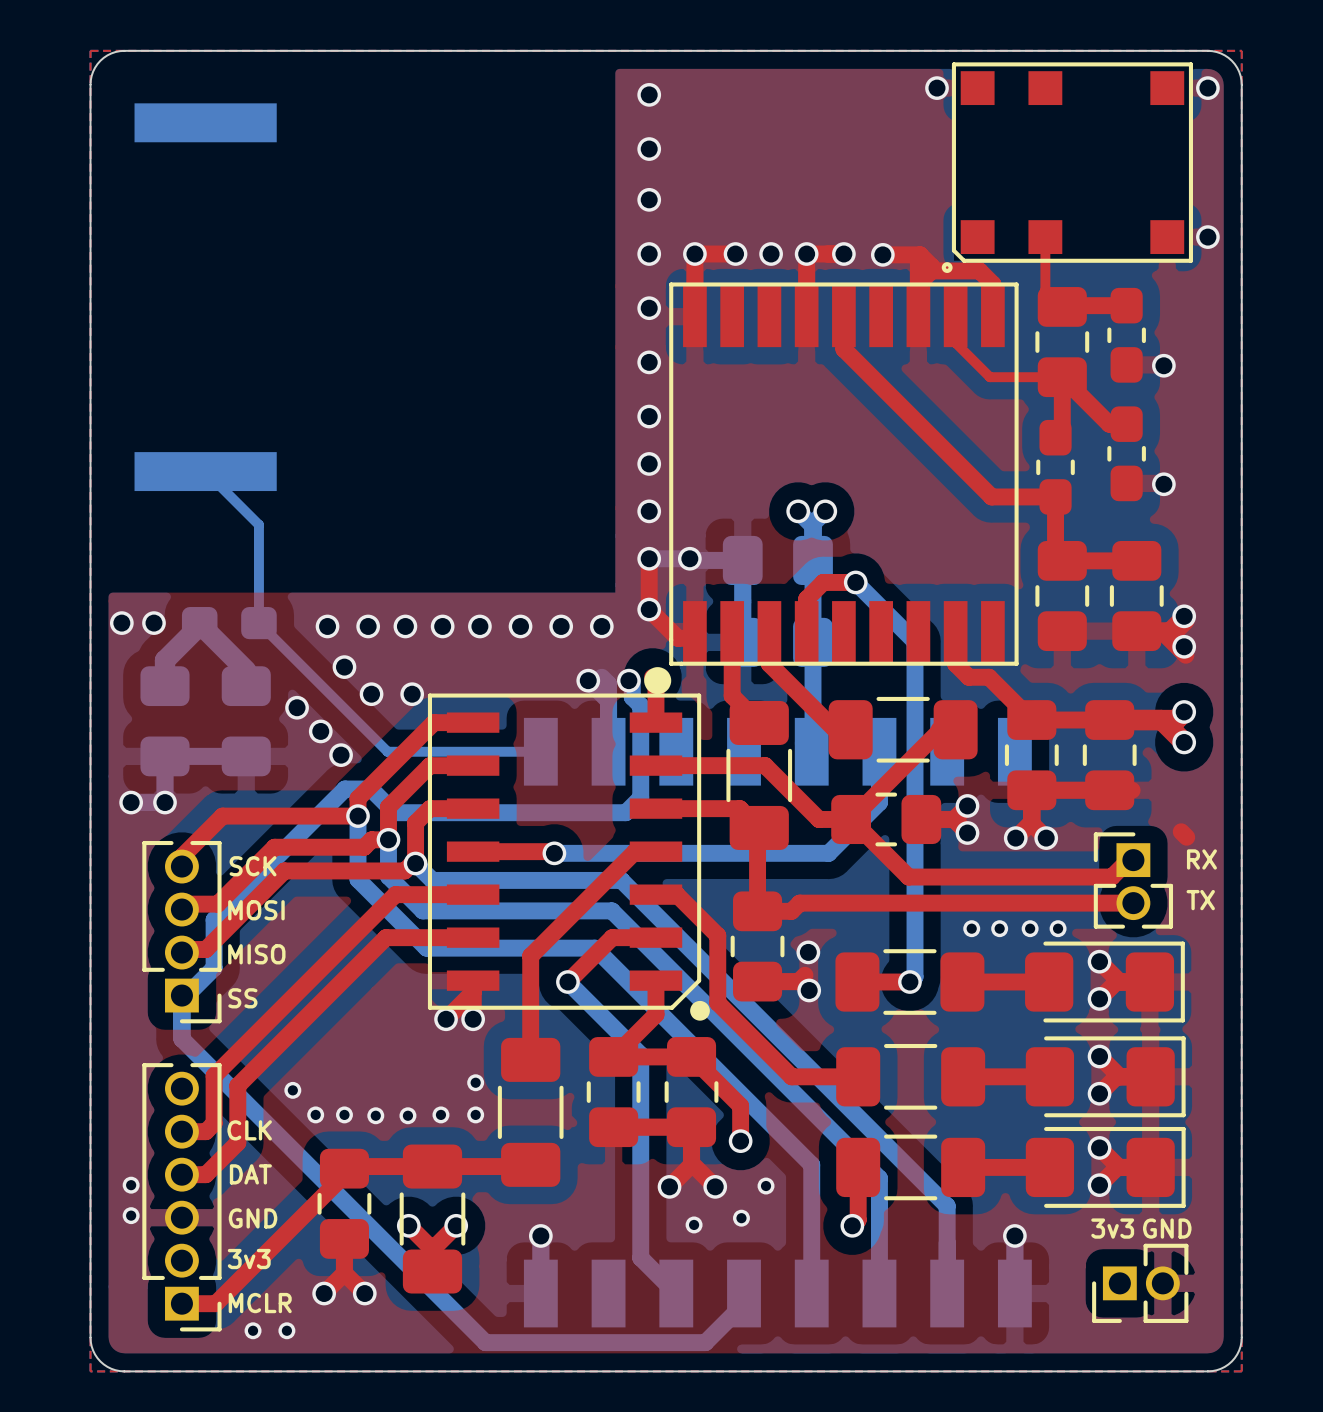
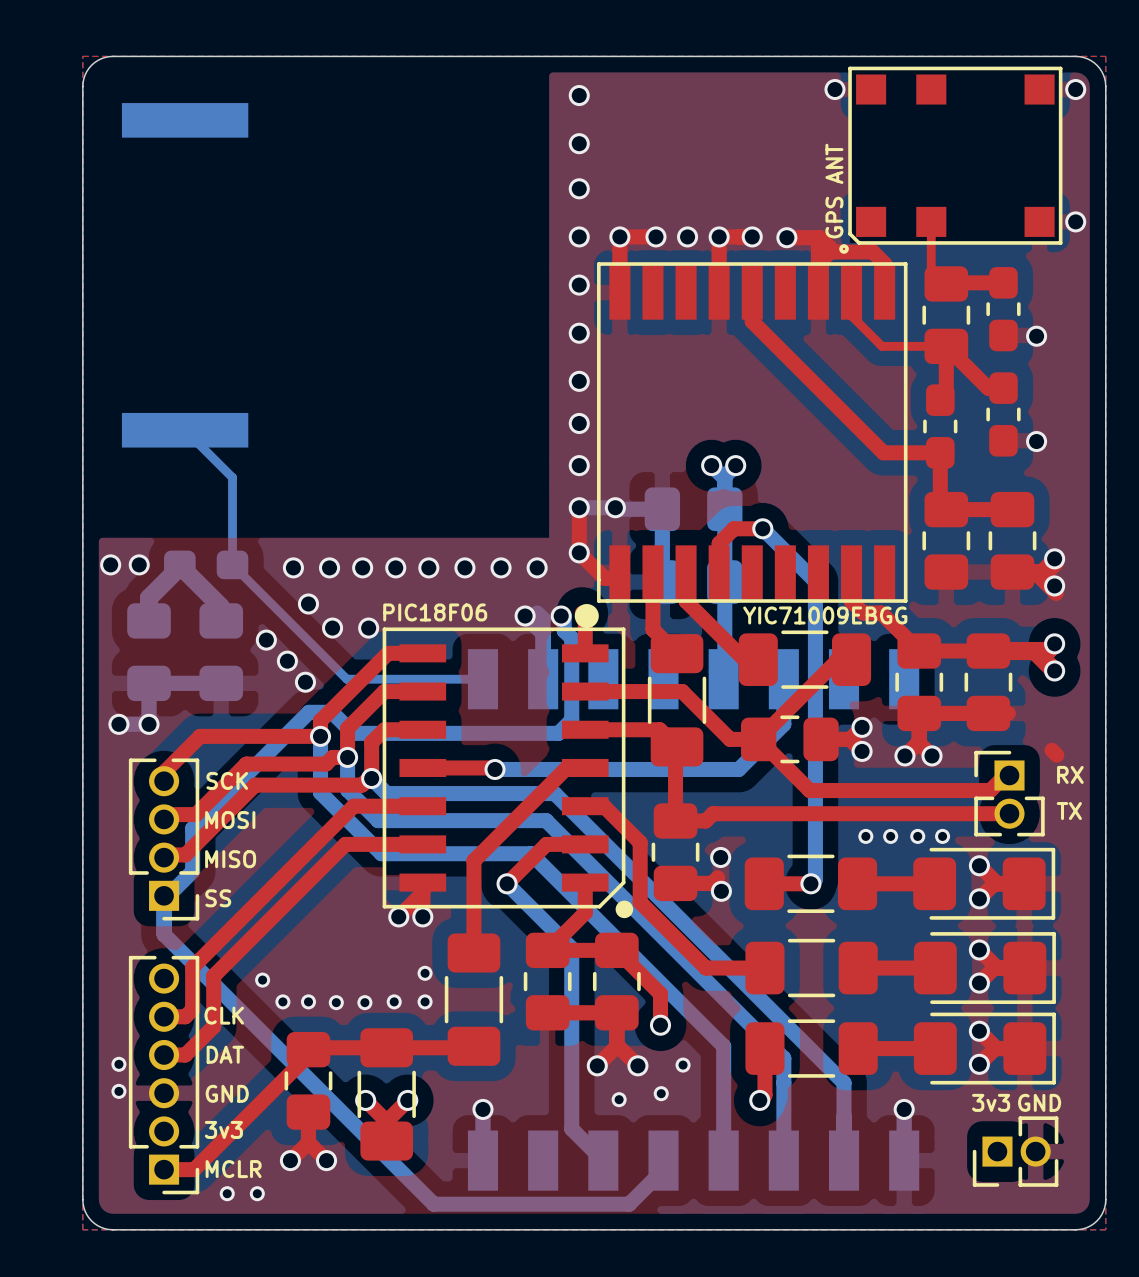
text: none -> GPS ANT (834, 191)
text: none -> PIC18F06 (435, 612)
text: none -> YIC71009EBGG (825, 615)

